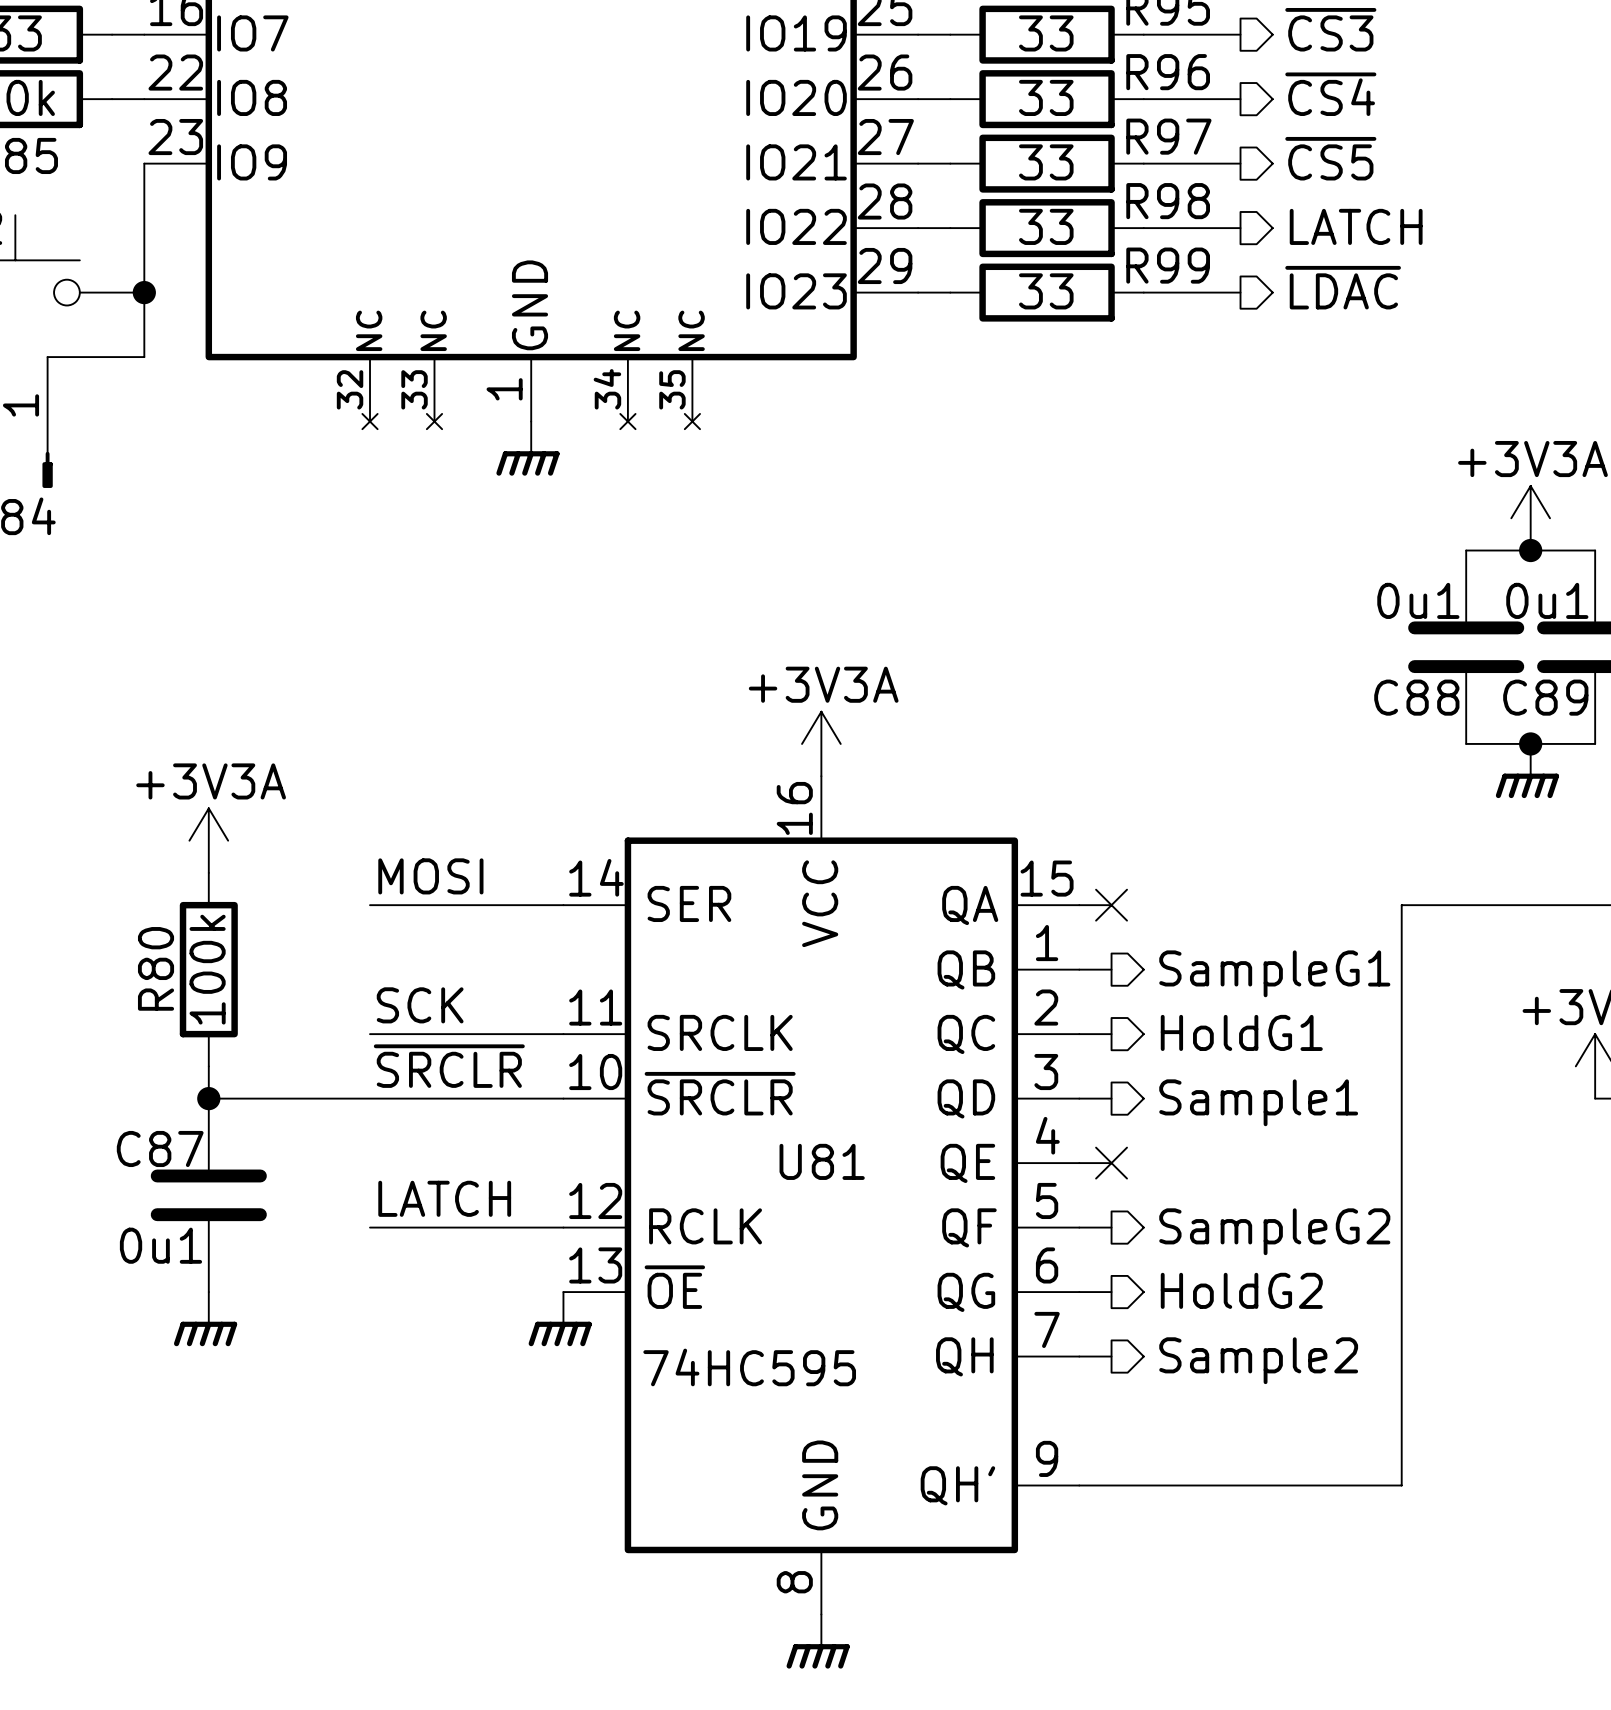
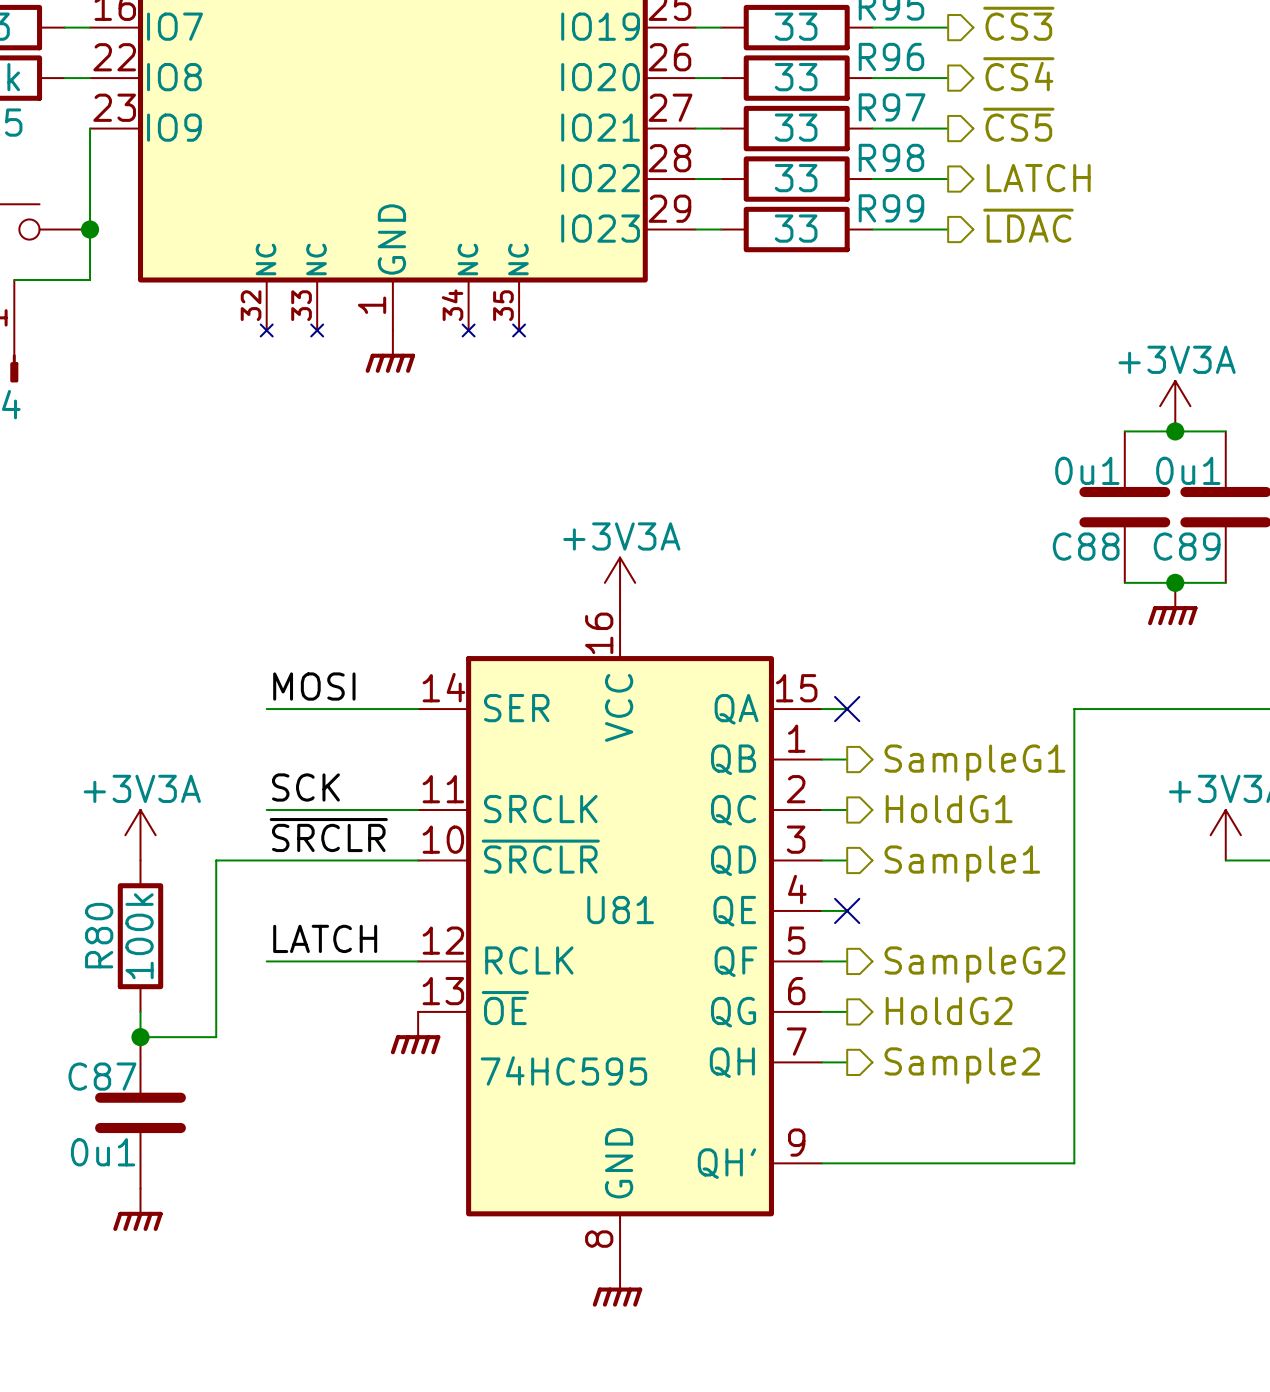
power symbol position: +3V3A (208, 840) -> +3V3A (140, 835)
R80 position: (208, 969) -> (140, 936)
wire: (208, 1066) (208, 1098) (305, 1098) -> (140, 1011) (140, 1037) (216, 1037) (216, 860)
junction: (208, 1098) -> none
C87 position: (208, 1195) -> (140, 1112)
power symbol position: (205, 1319) -> (137, 1209)
junction: none -> (140, 1037)

